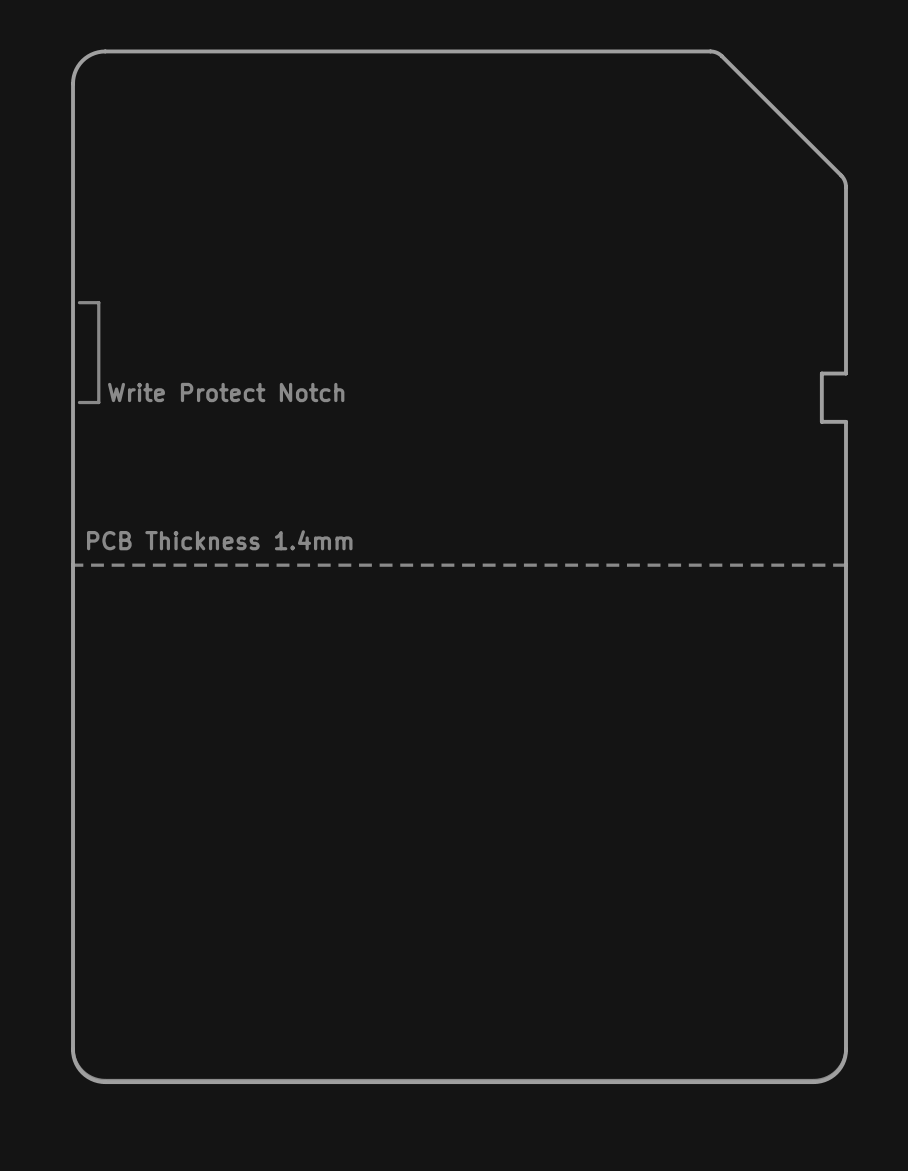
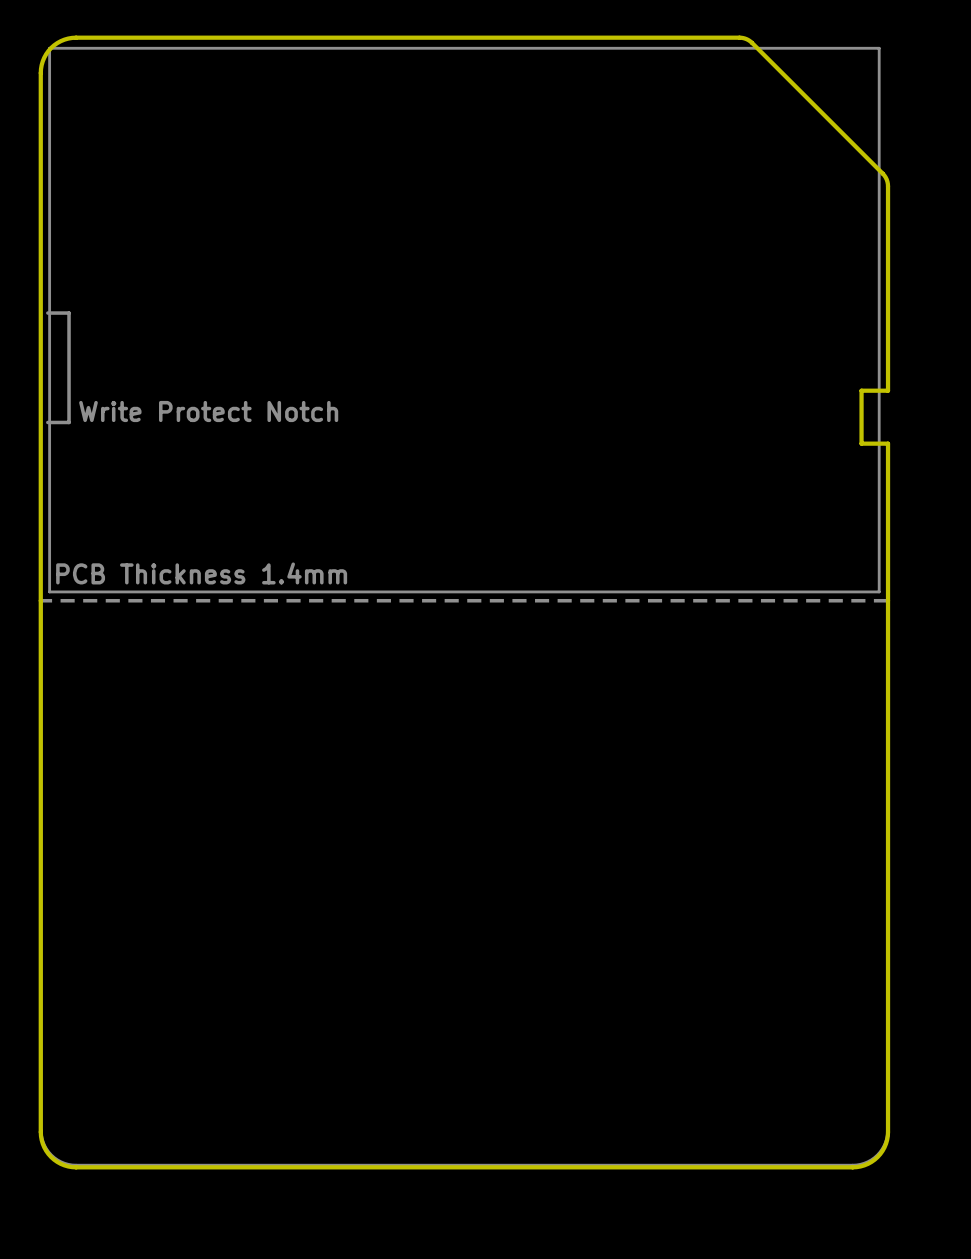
line: none -> (49, 48) (879, 48) (879, 591) (49, 591) (49, 48)

